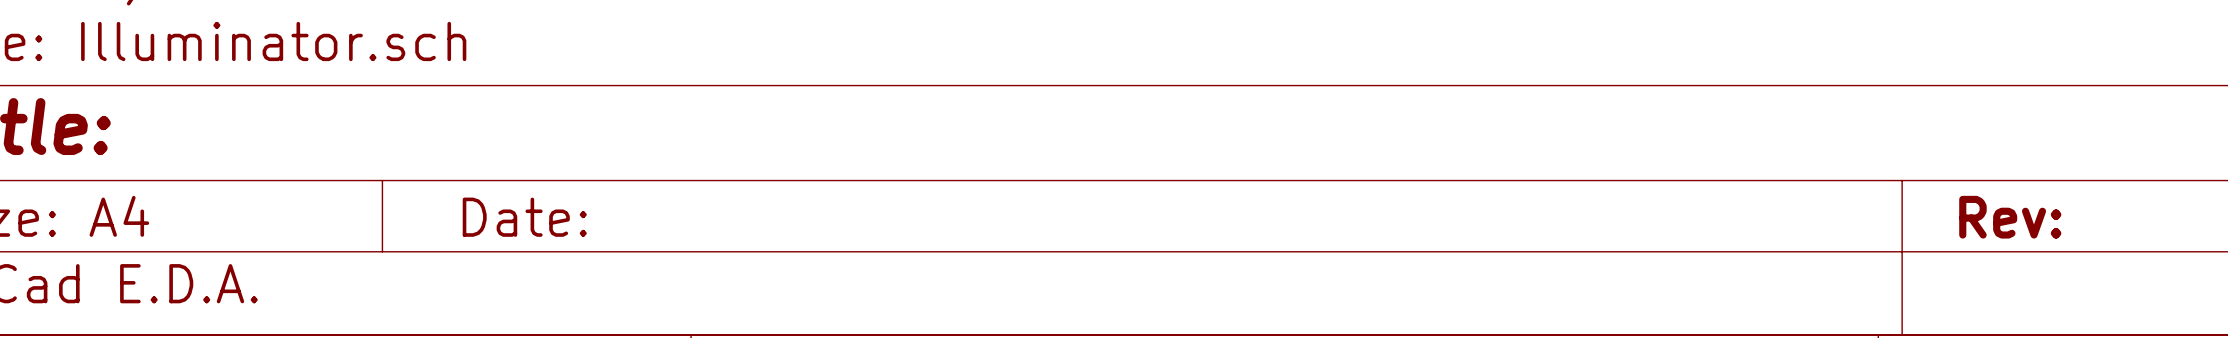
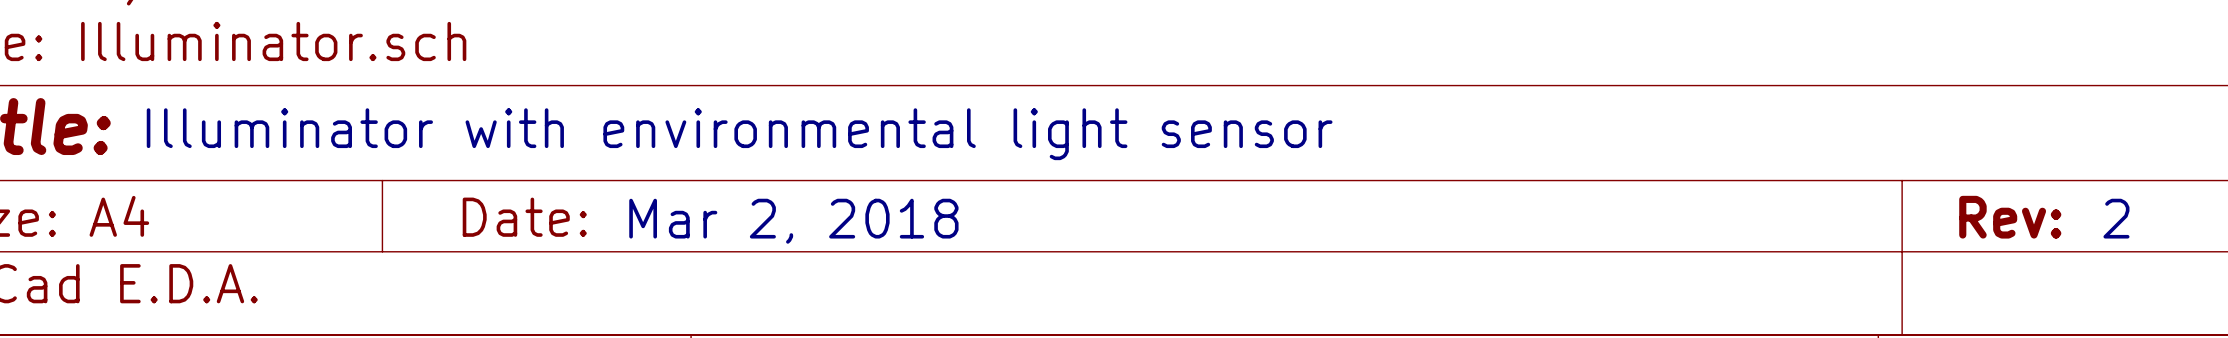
text: none -> Illuminator with environmental light sensor (739, 134)
text: none -> 2 (2116, 218)
text: none -> Mar 2, 2018 (793, 221)

